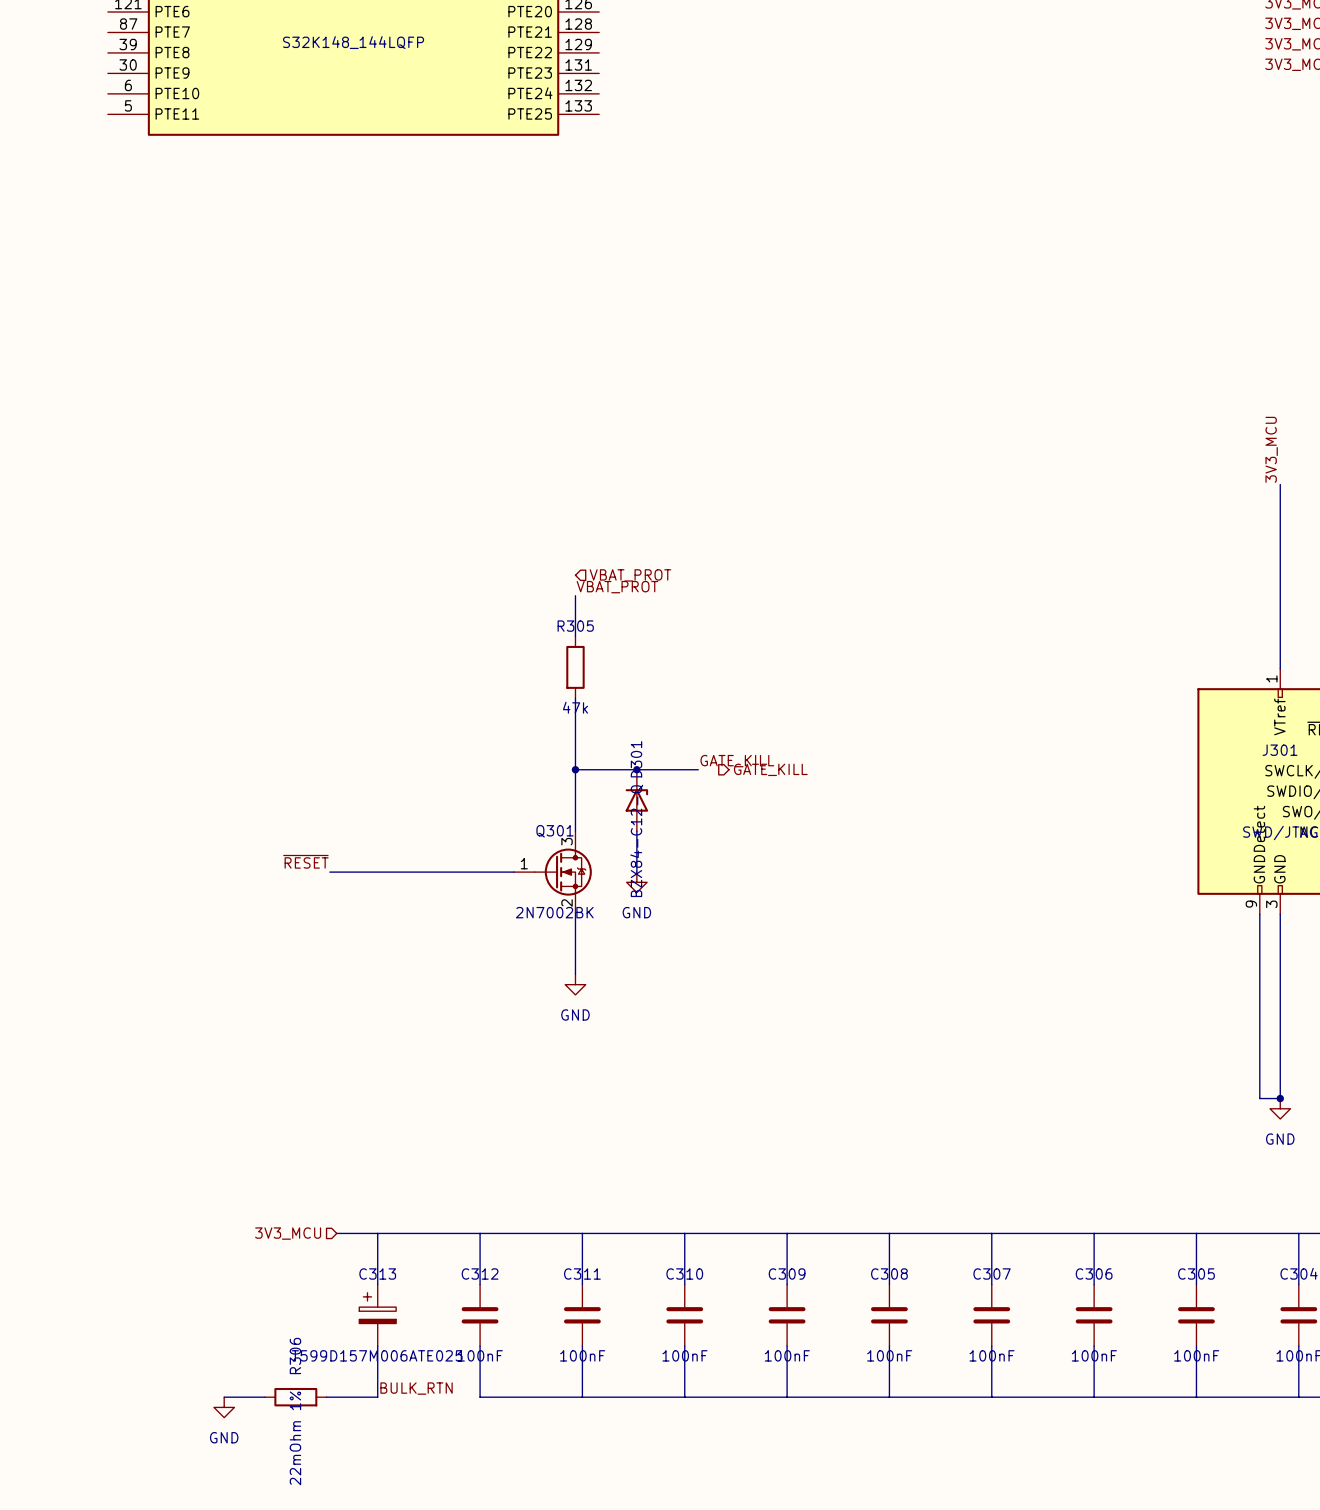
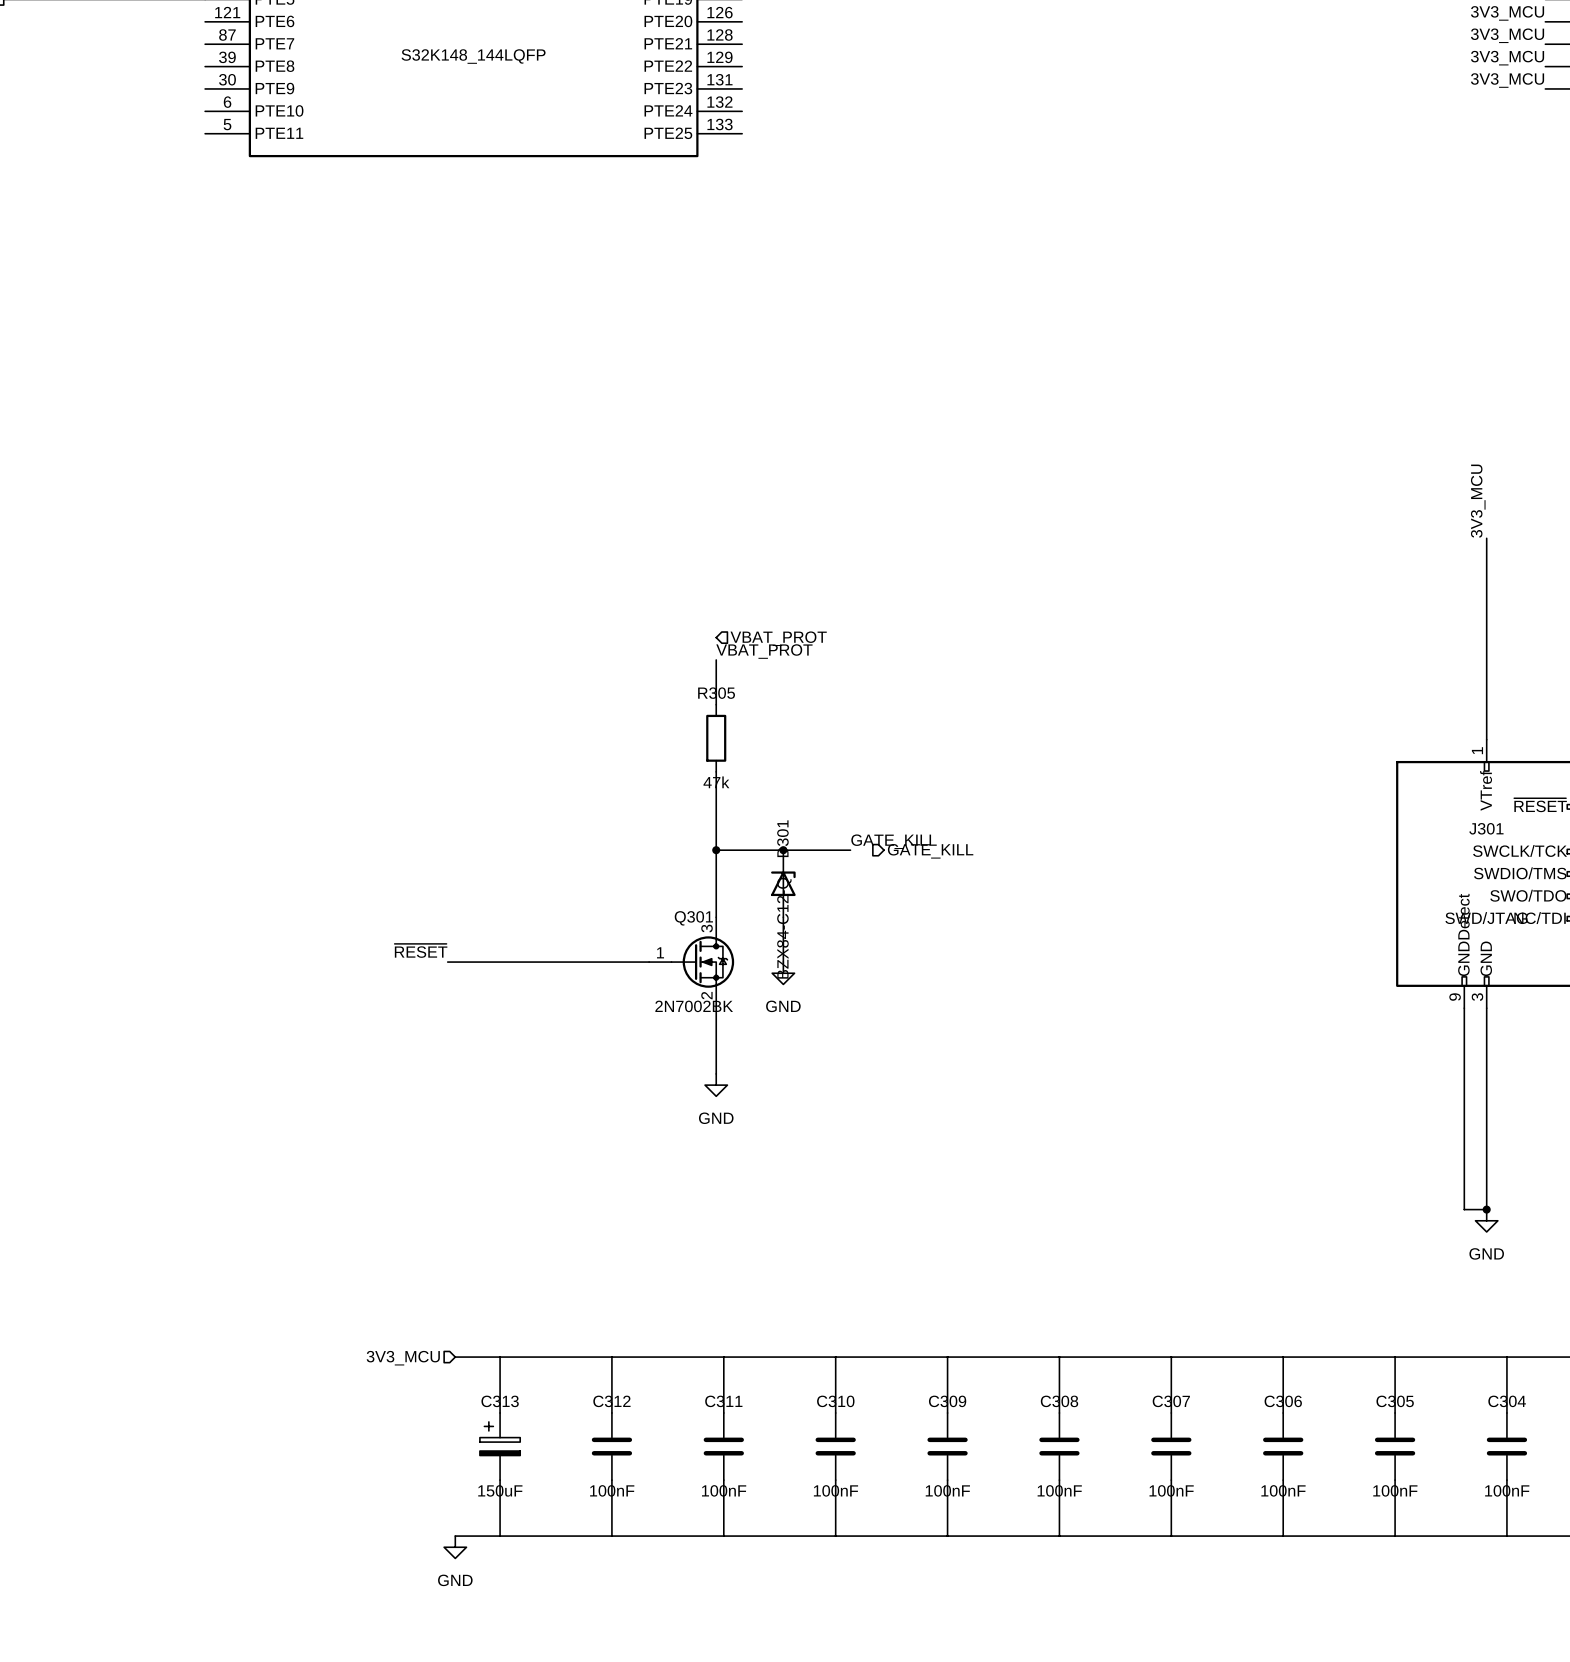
C313 value: T599D157M006ATE025 (377, 1355) -> 150uF (500, 1490)
label: BULK_RTN (416, 1388) -> none
wire: (224, 1397) (265, 1397) -> none
R306: 22mOhm 1% (295, 1397) -> none
wire: (326, 1397) (336, 1397) -> none
wire: none -> (500, 1536) (611, 1536)
power symbol position: GND (224, 1407) -> GND (455, 1547)

